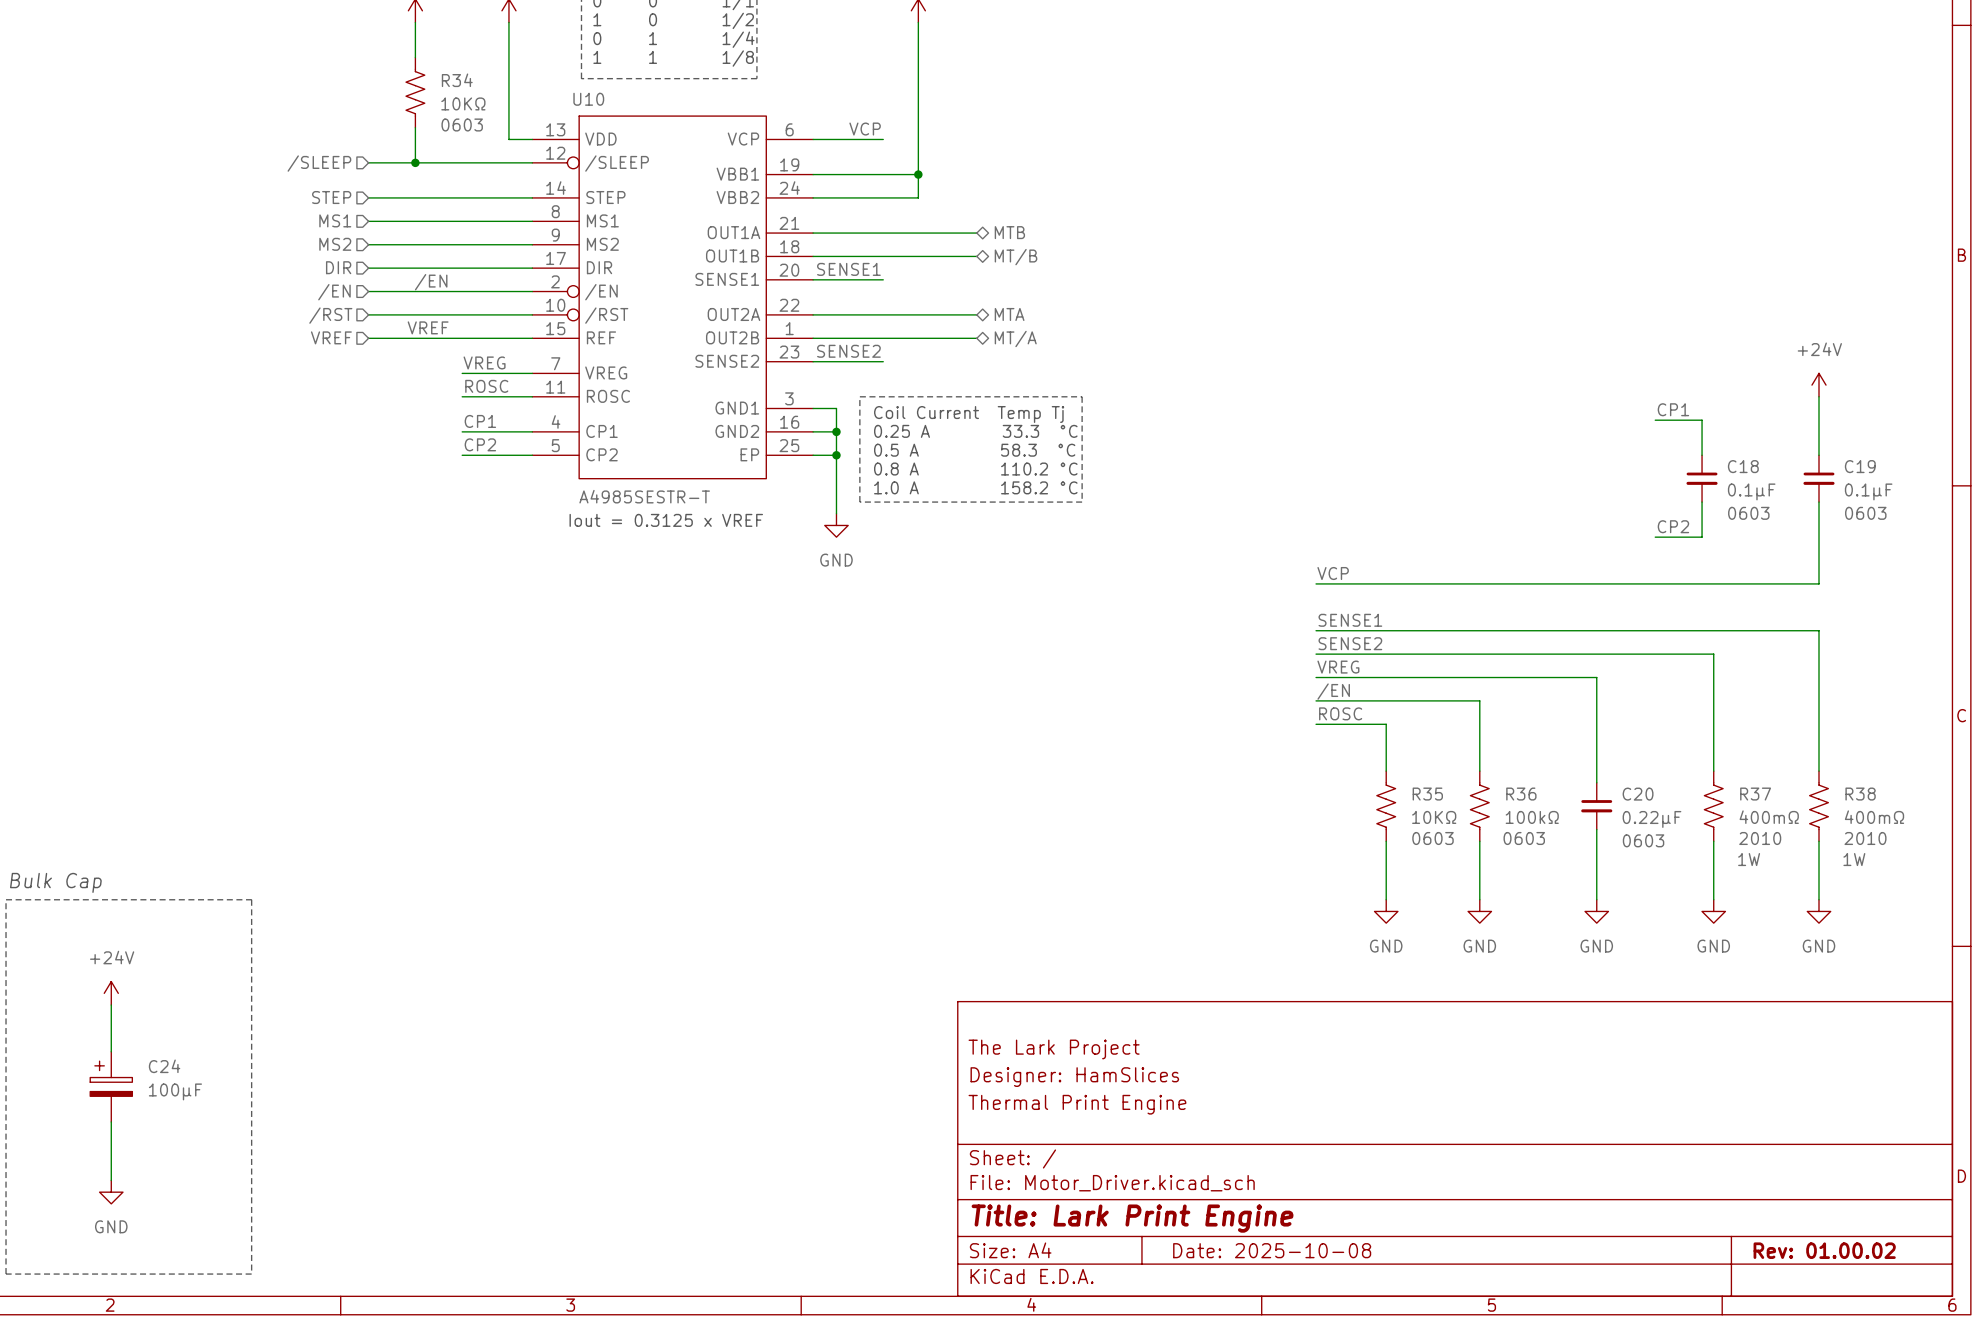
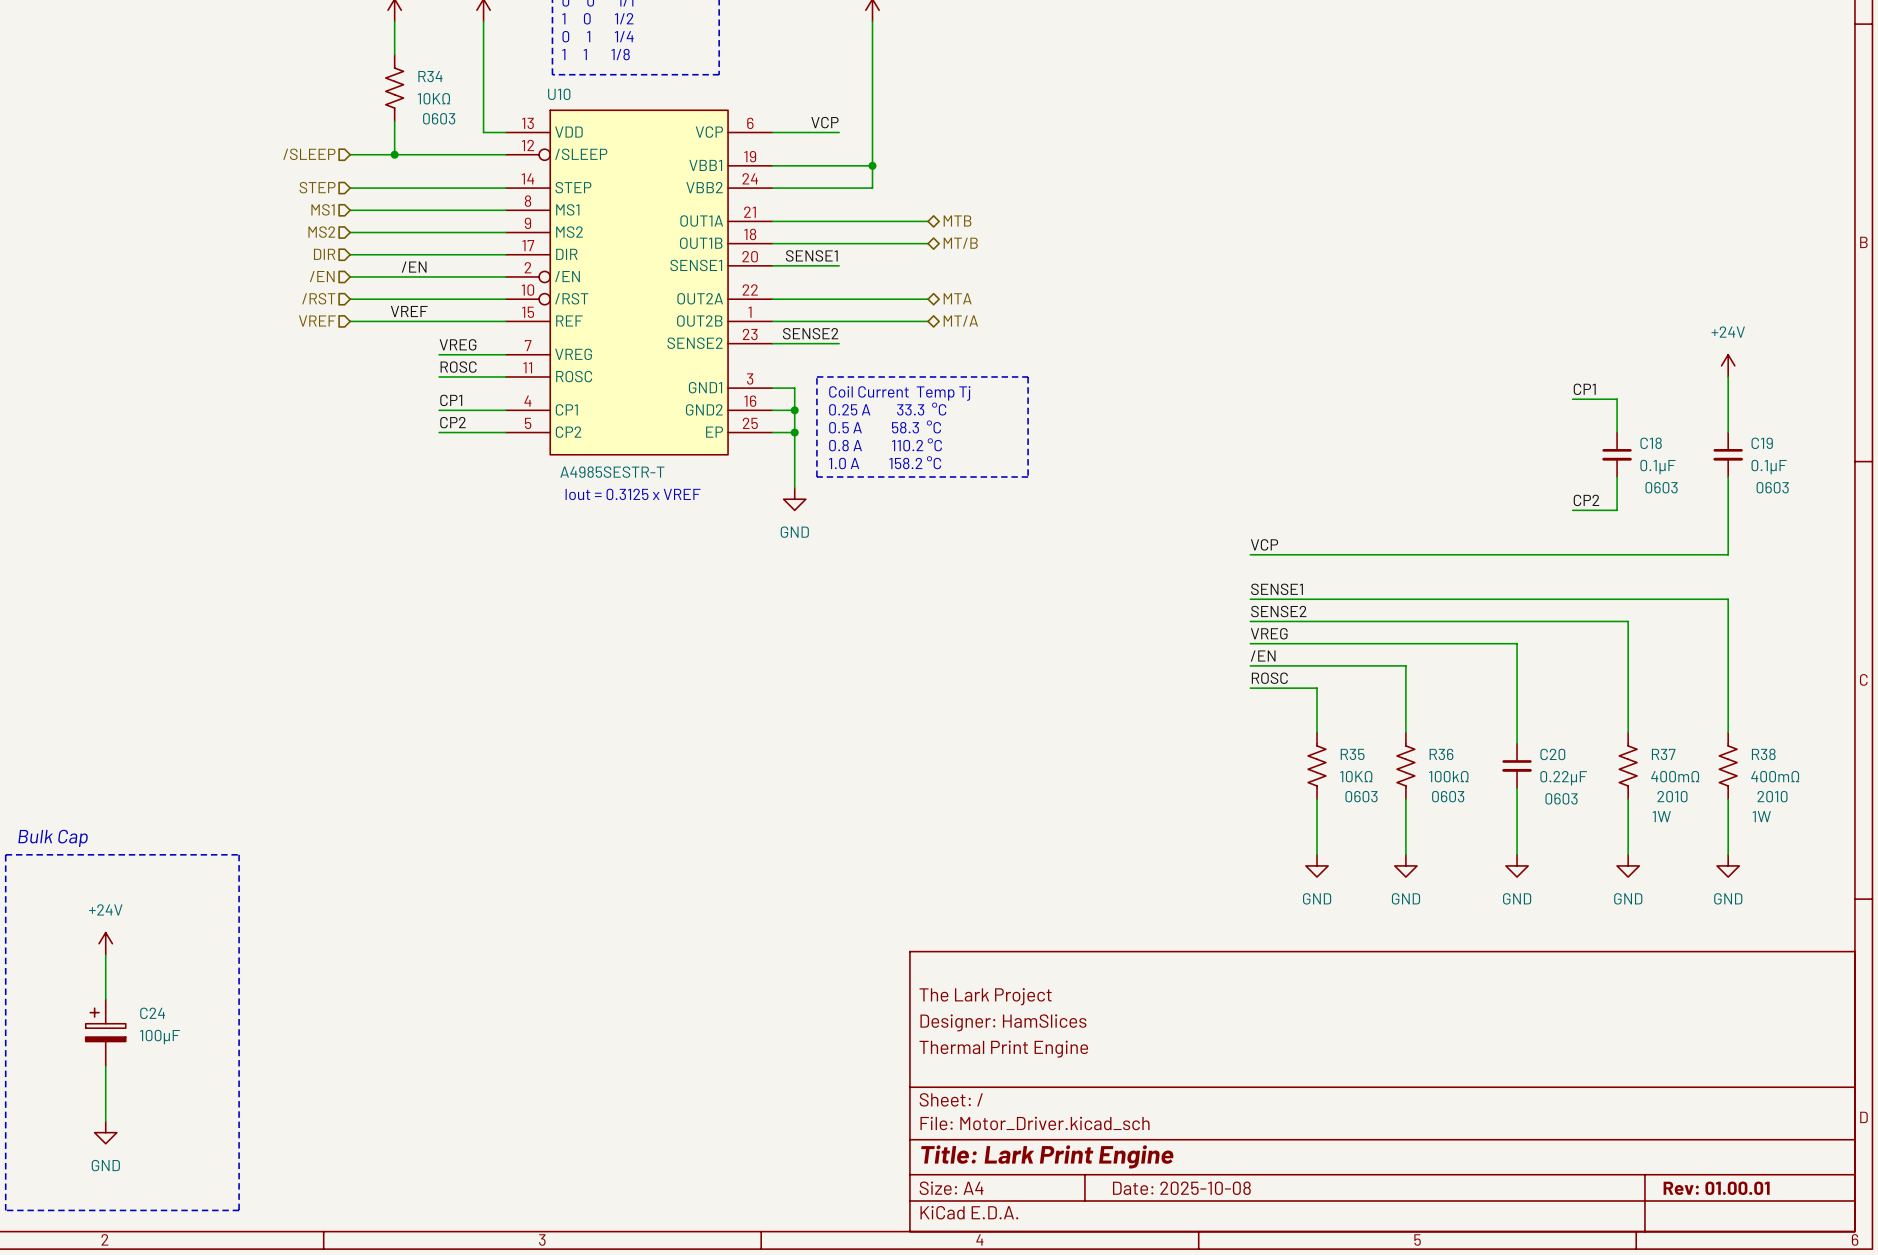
title block: Rev: 01.00.02 (1824, 1250) -> Rev: 01.00.01 (1716, 1188)

